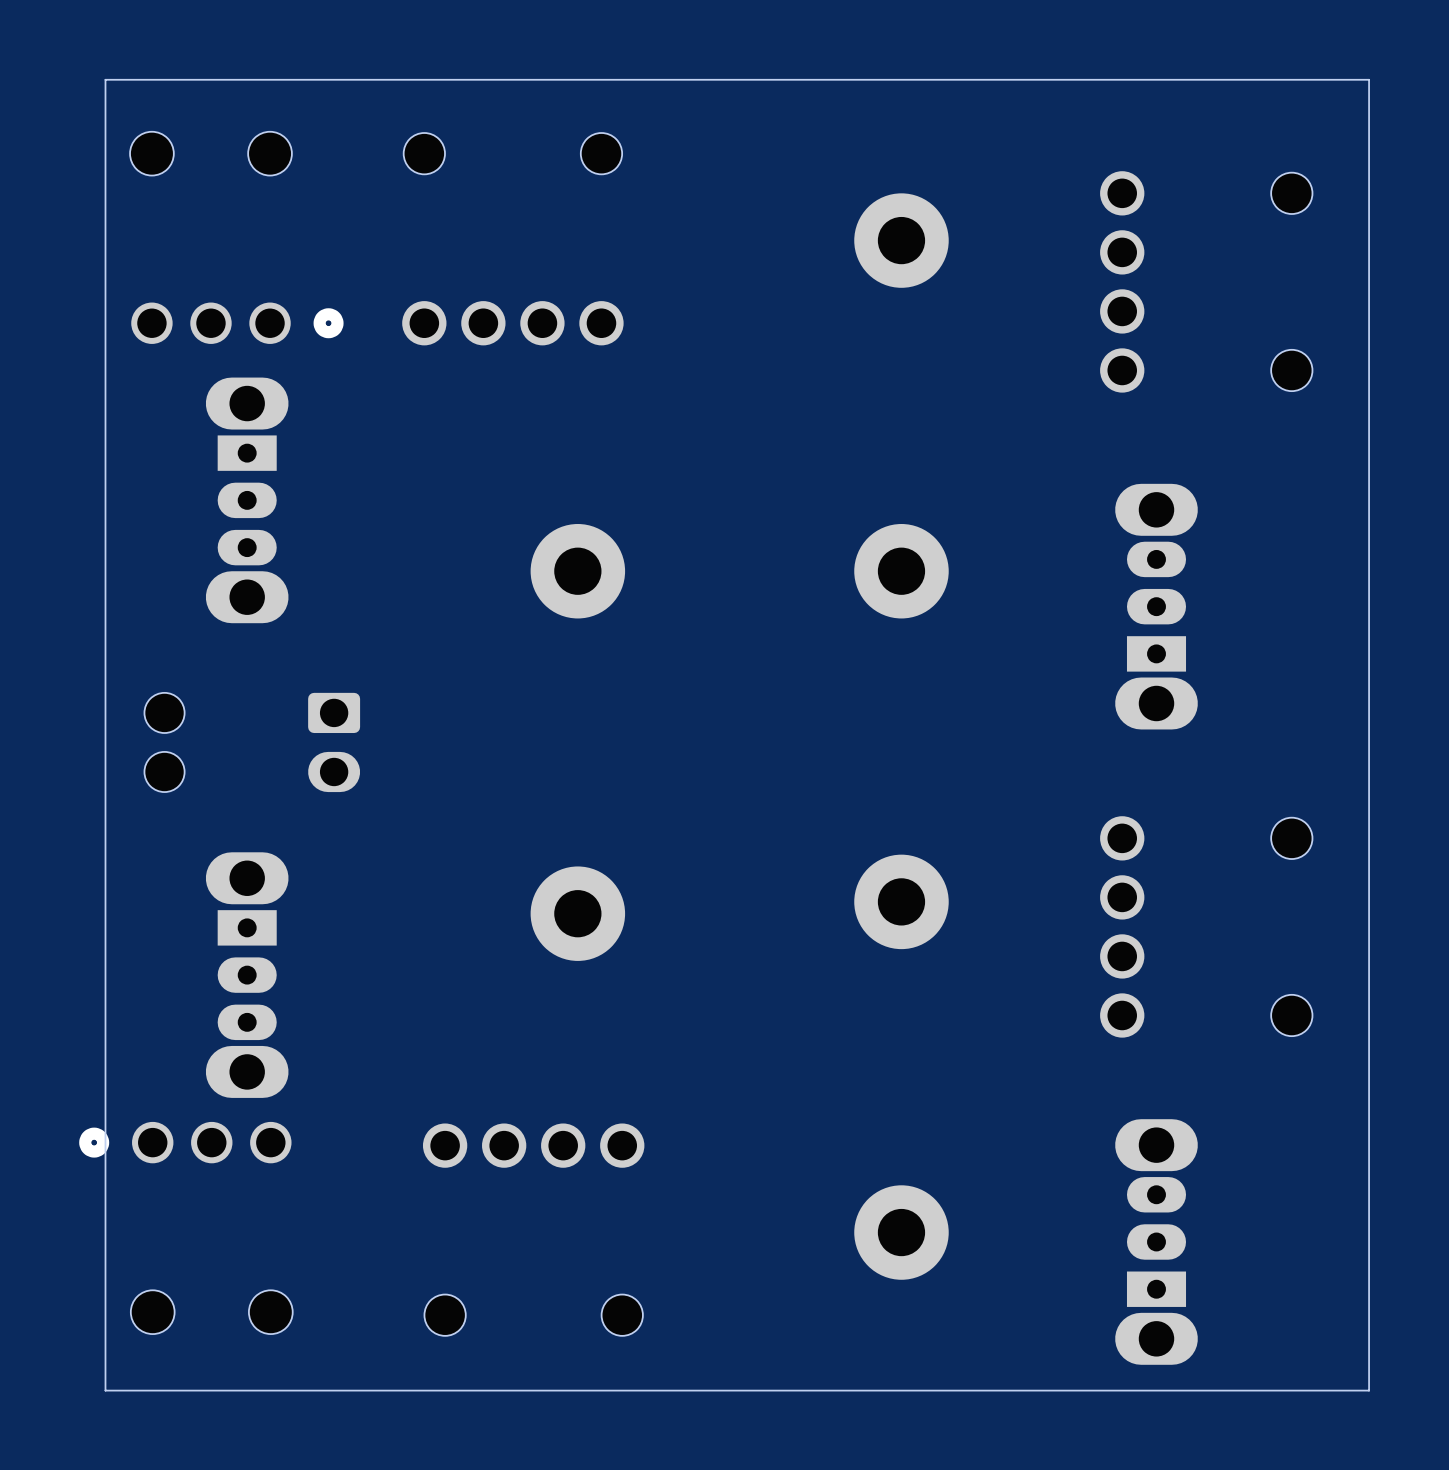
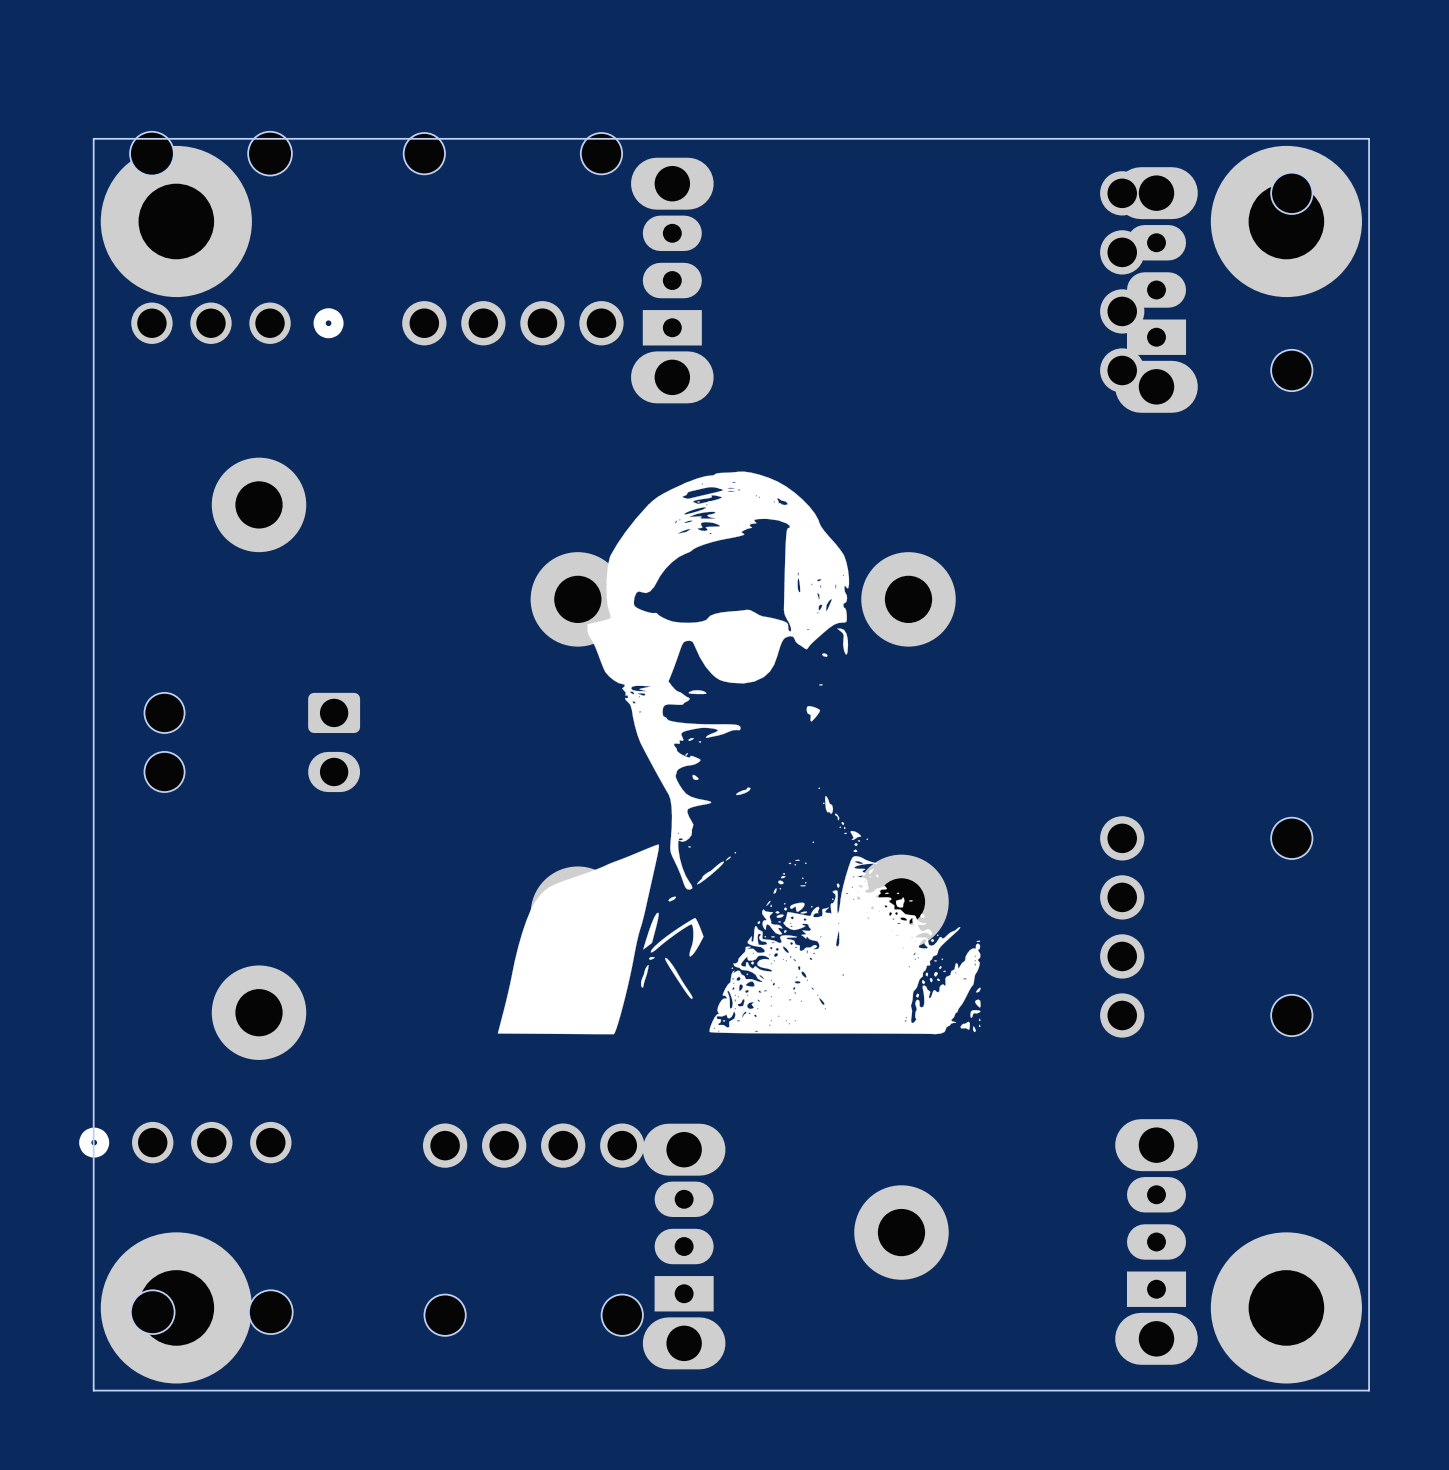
board edge: (1369, 138) (1369, 79) (105, 79) (105, 1390) -> (1369, 138) (93, 138) (93, 1390) (105, 1390)
part: none -> (176, 221)
part: none -> (1286, 221)
part: (901, 240) -> none
part: none -> (672, 280)
part: none -> (1156, 289)
part footprint: [205, 377, 289, 624] -> [211, 457, 307, 553]
drawing: none -> [497, 471, 981, 1035]
part position: (577, 571) -> (577, 599)
part position: (901, 571) -> (908, 599)
part: (1156, 606) -> none
part: (247, 975) -> none
part: none -> (259, 1012)
part: none -> (684, 1246)
part: none -> (176, 1307)
part: none -> (1286, 1307)

